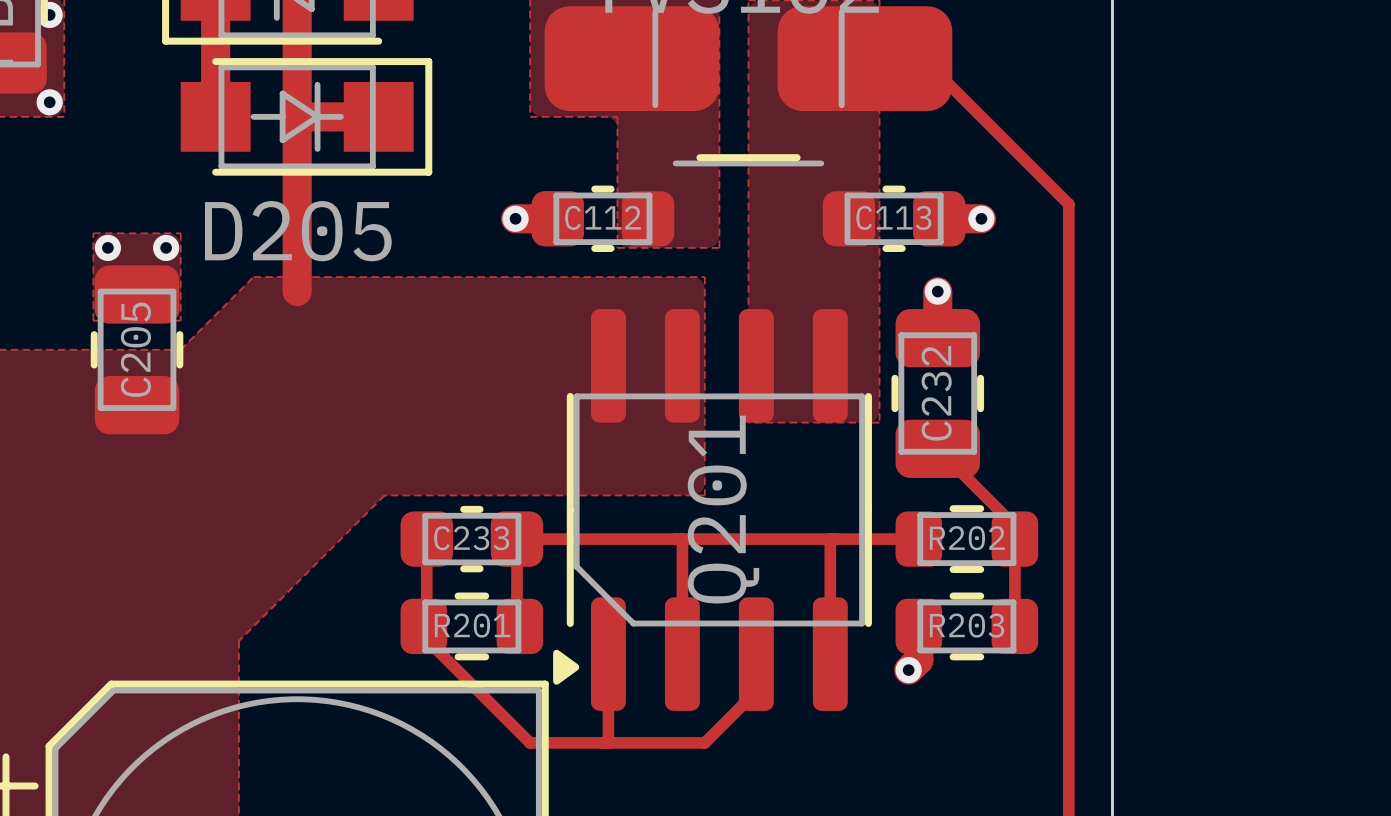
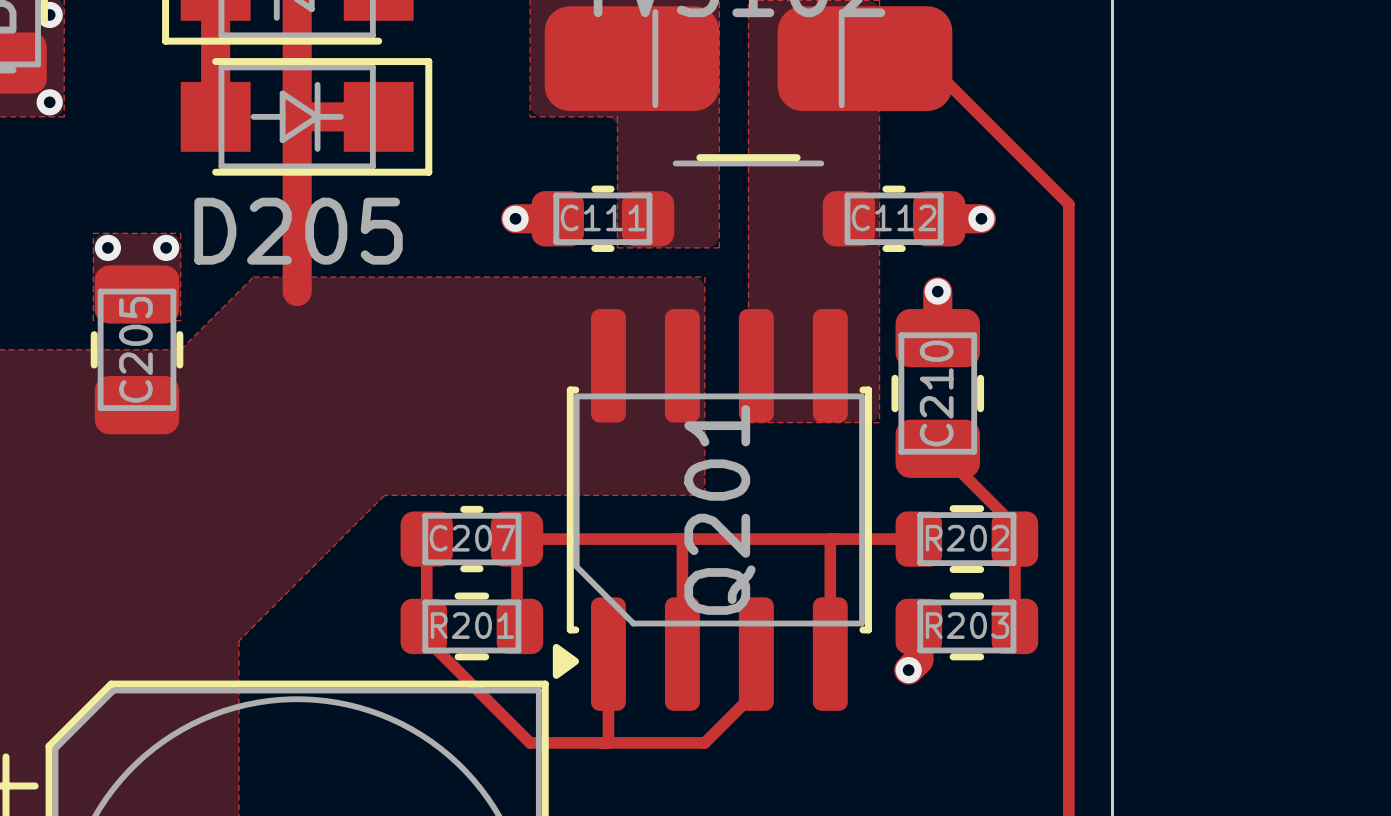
C112 name: C112 (603, 217) -> C111 (602, 217)
C113 name: C113 (893, 217) -> C112 (894, 217)
Q201 footprint: [553, 309, 872, 711] -> [552, 309, 872, 711]
C232 name: C232 (936, 393) -> C210 (936, 393)
C233 name: C233 (471, 538) -> C207 (472, 538)

